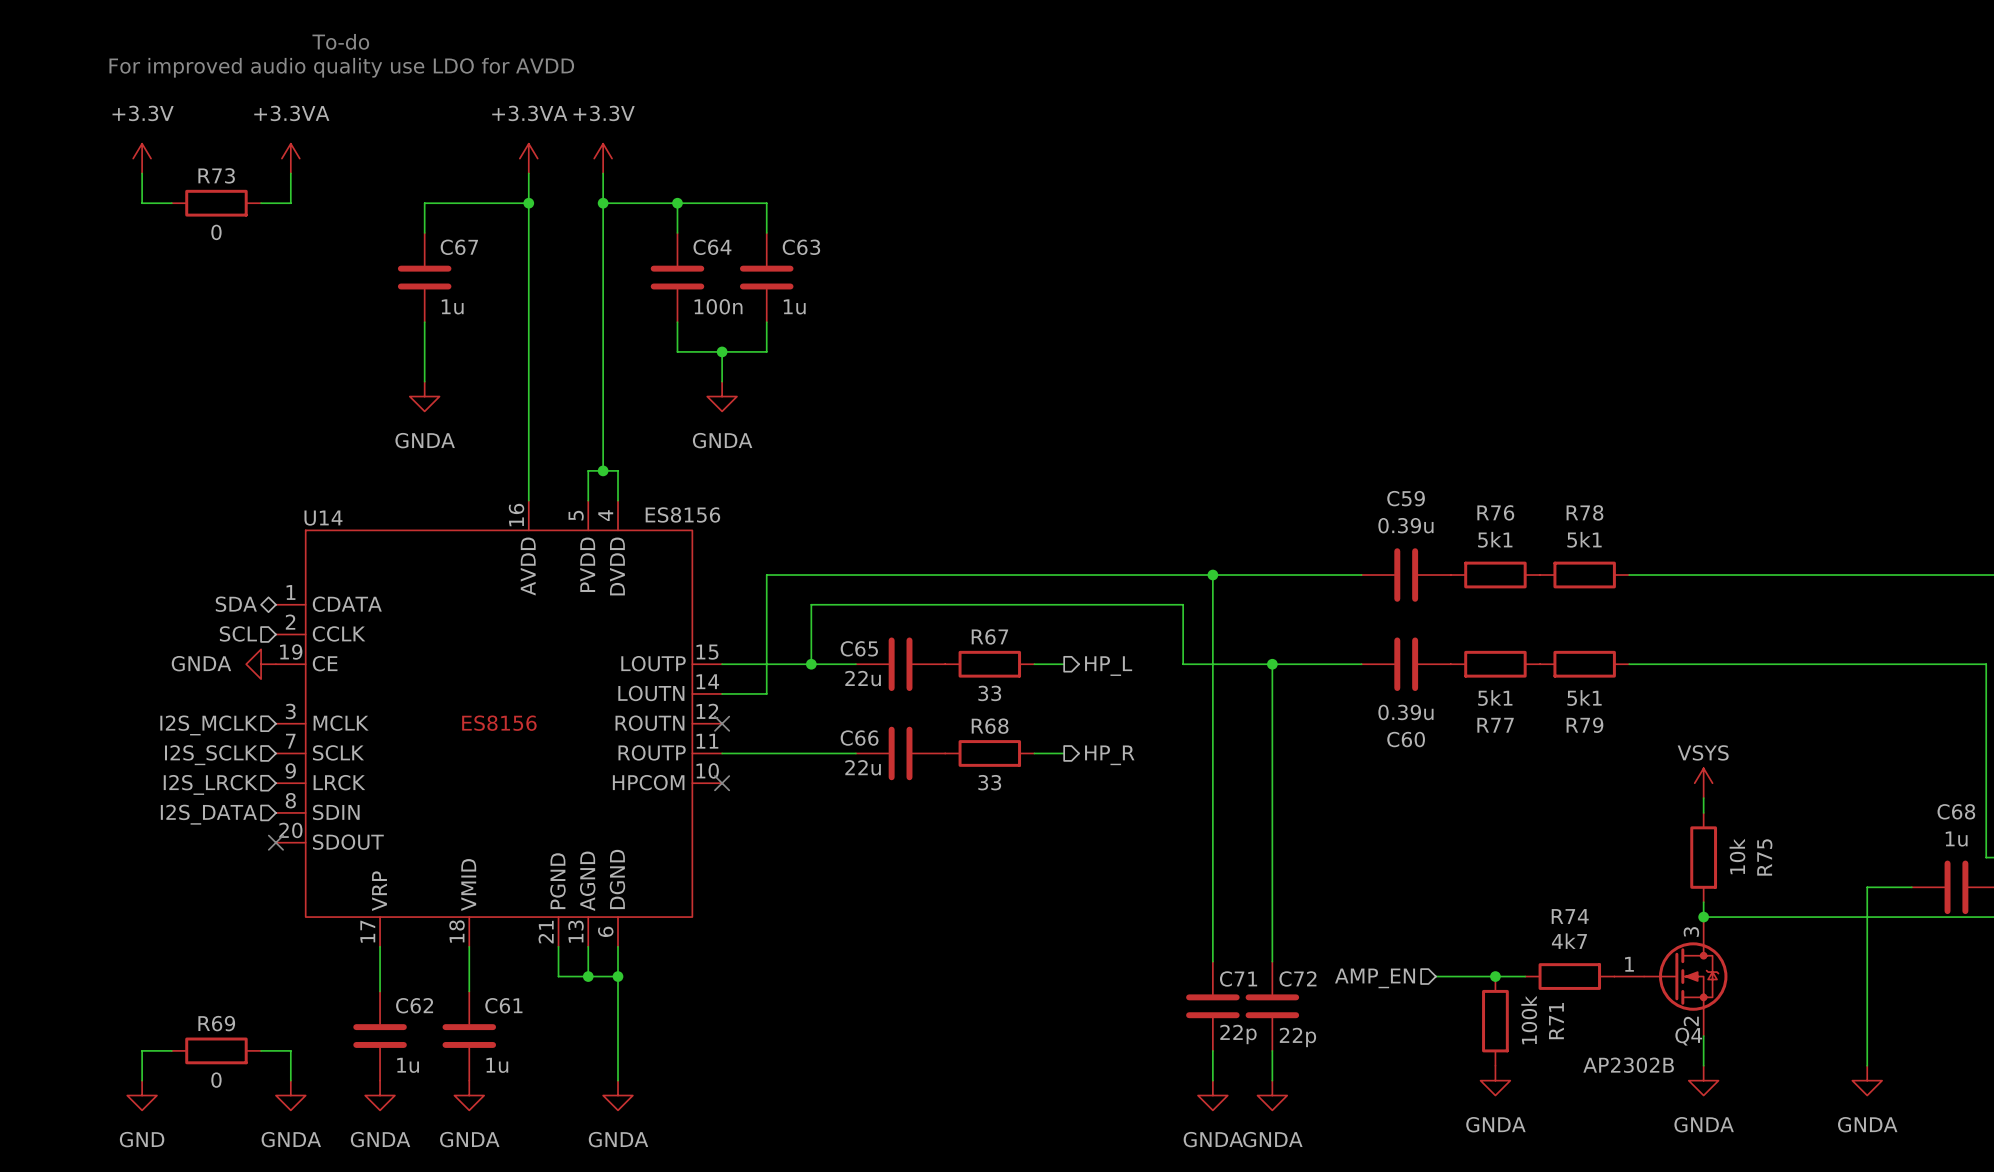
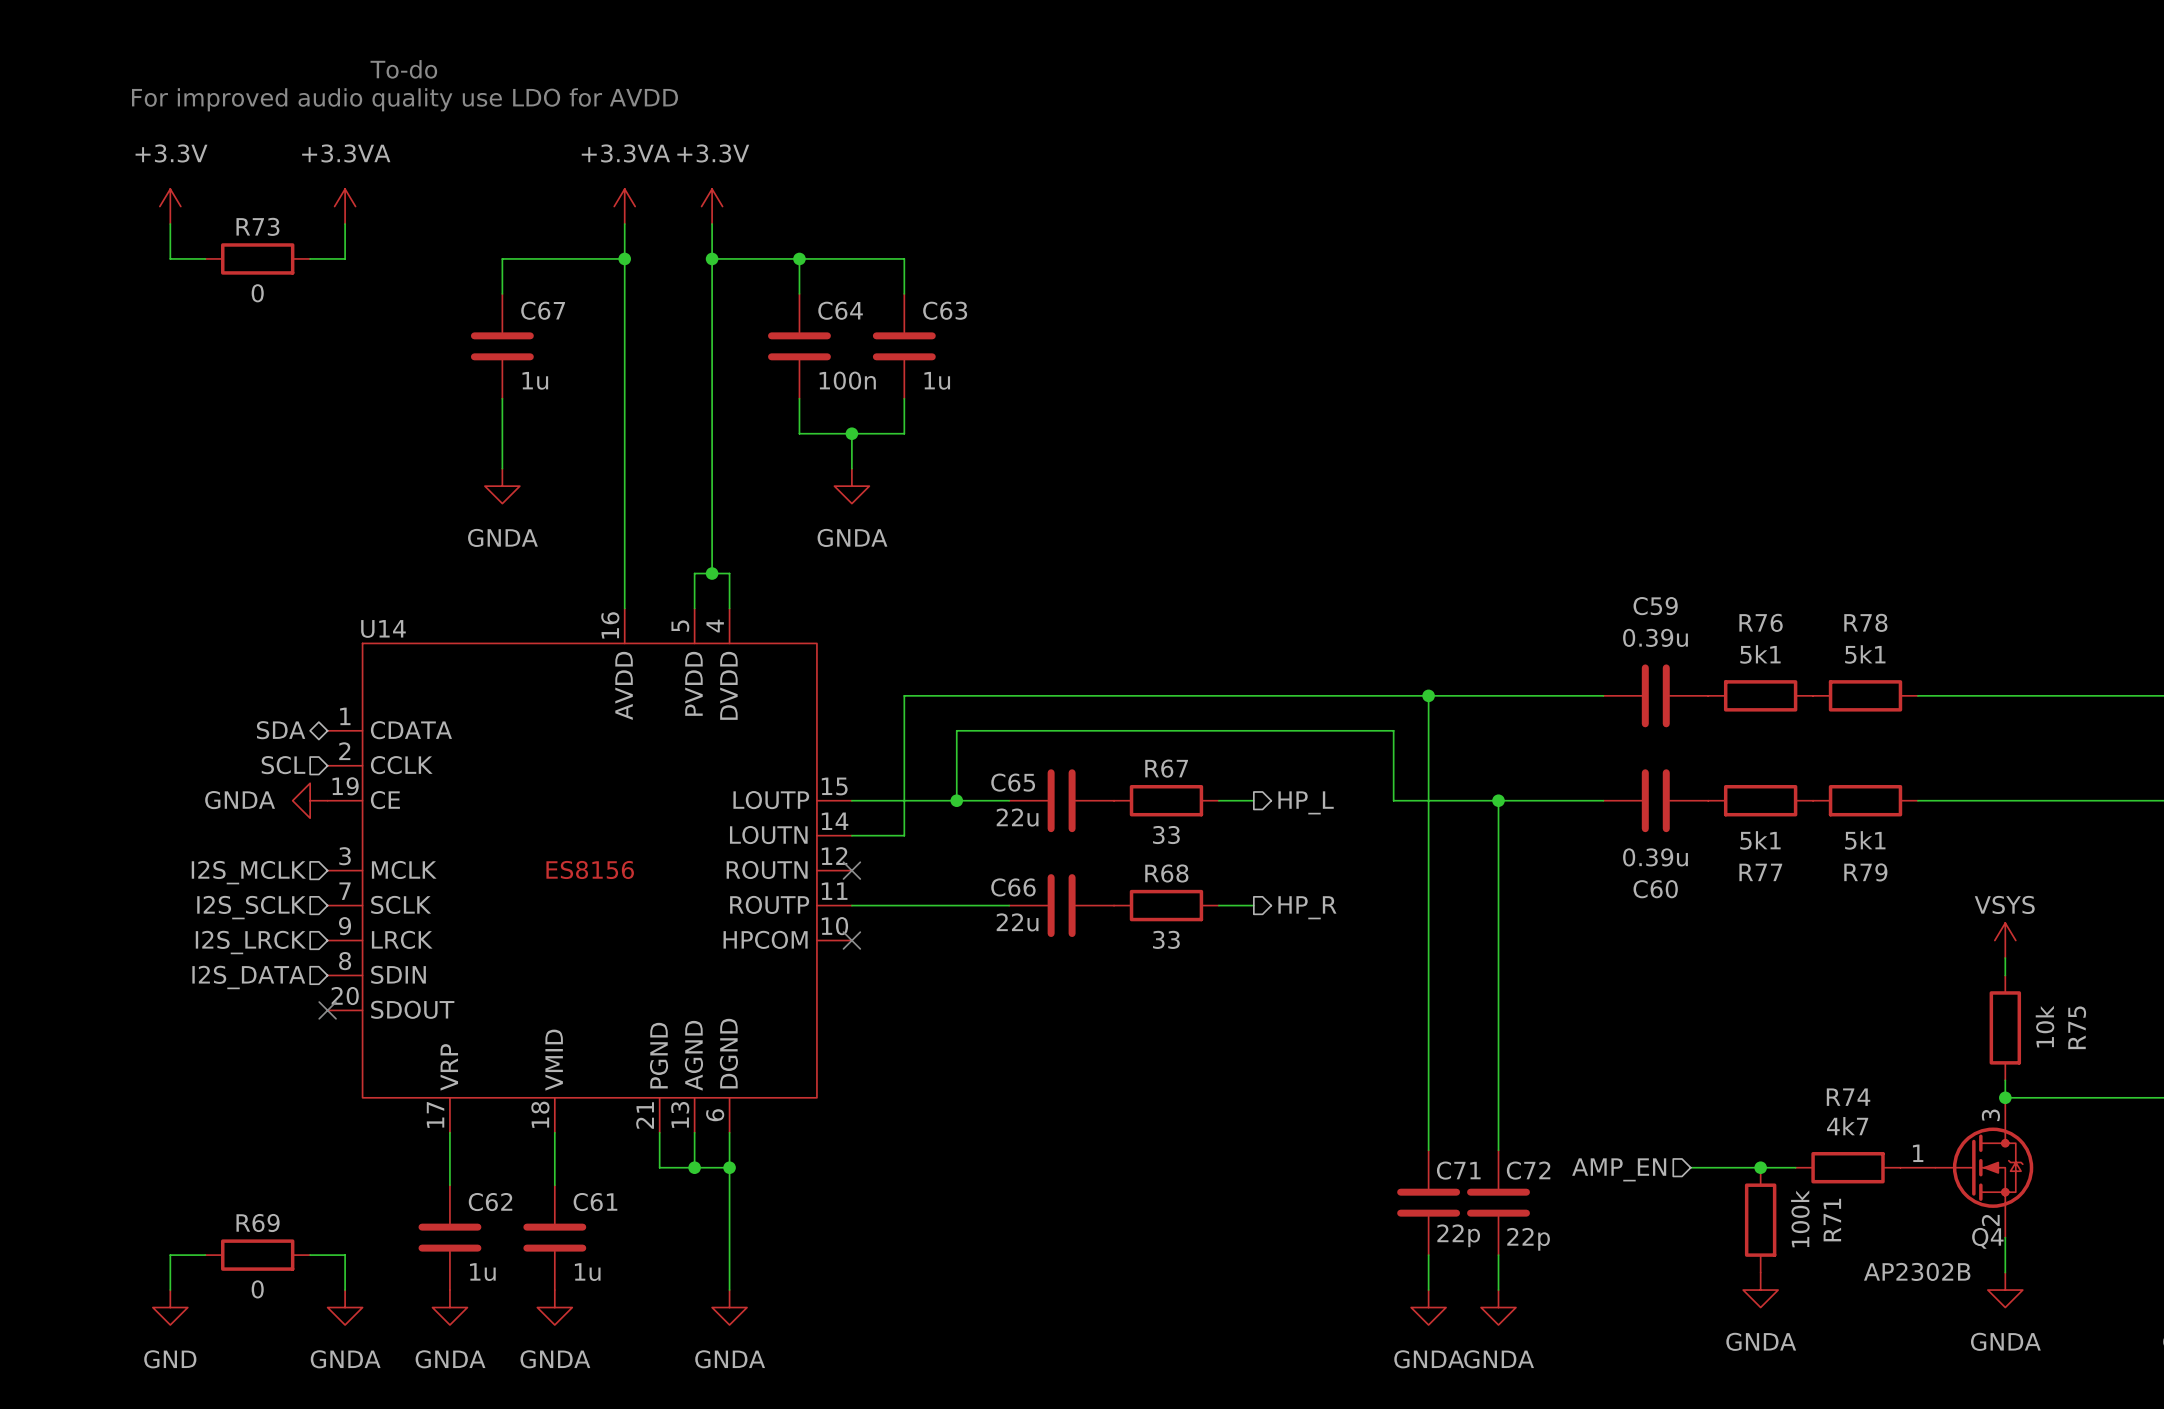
U14 value: ES8156 (682, 514) -> none

